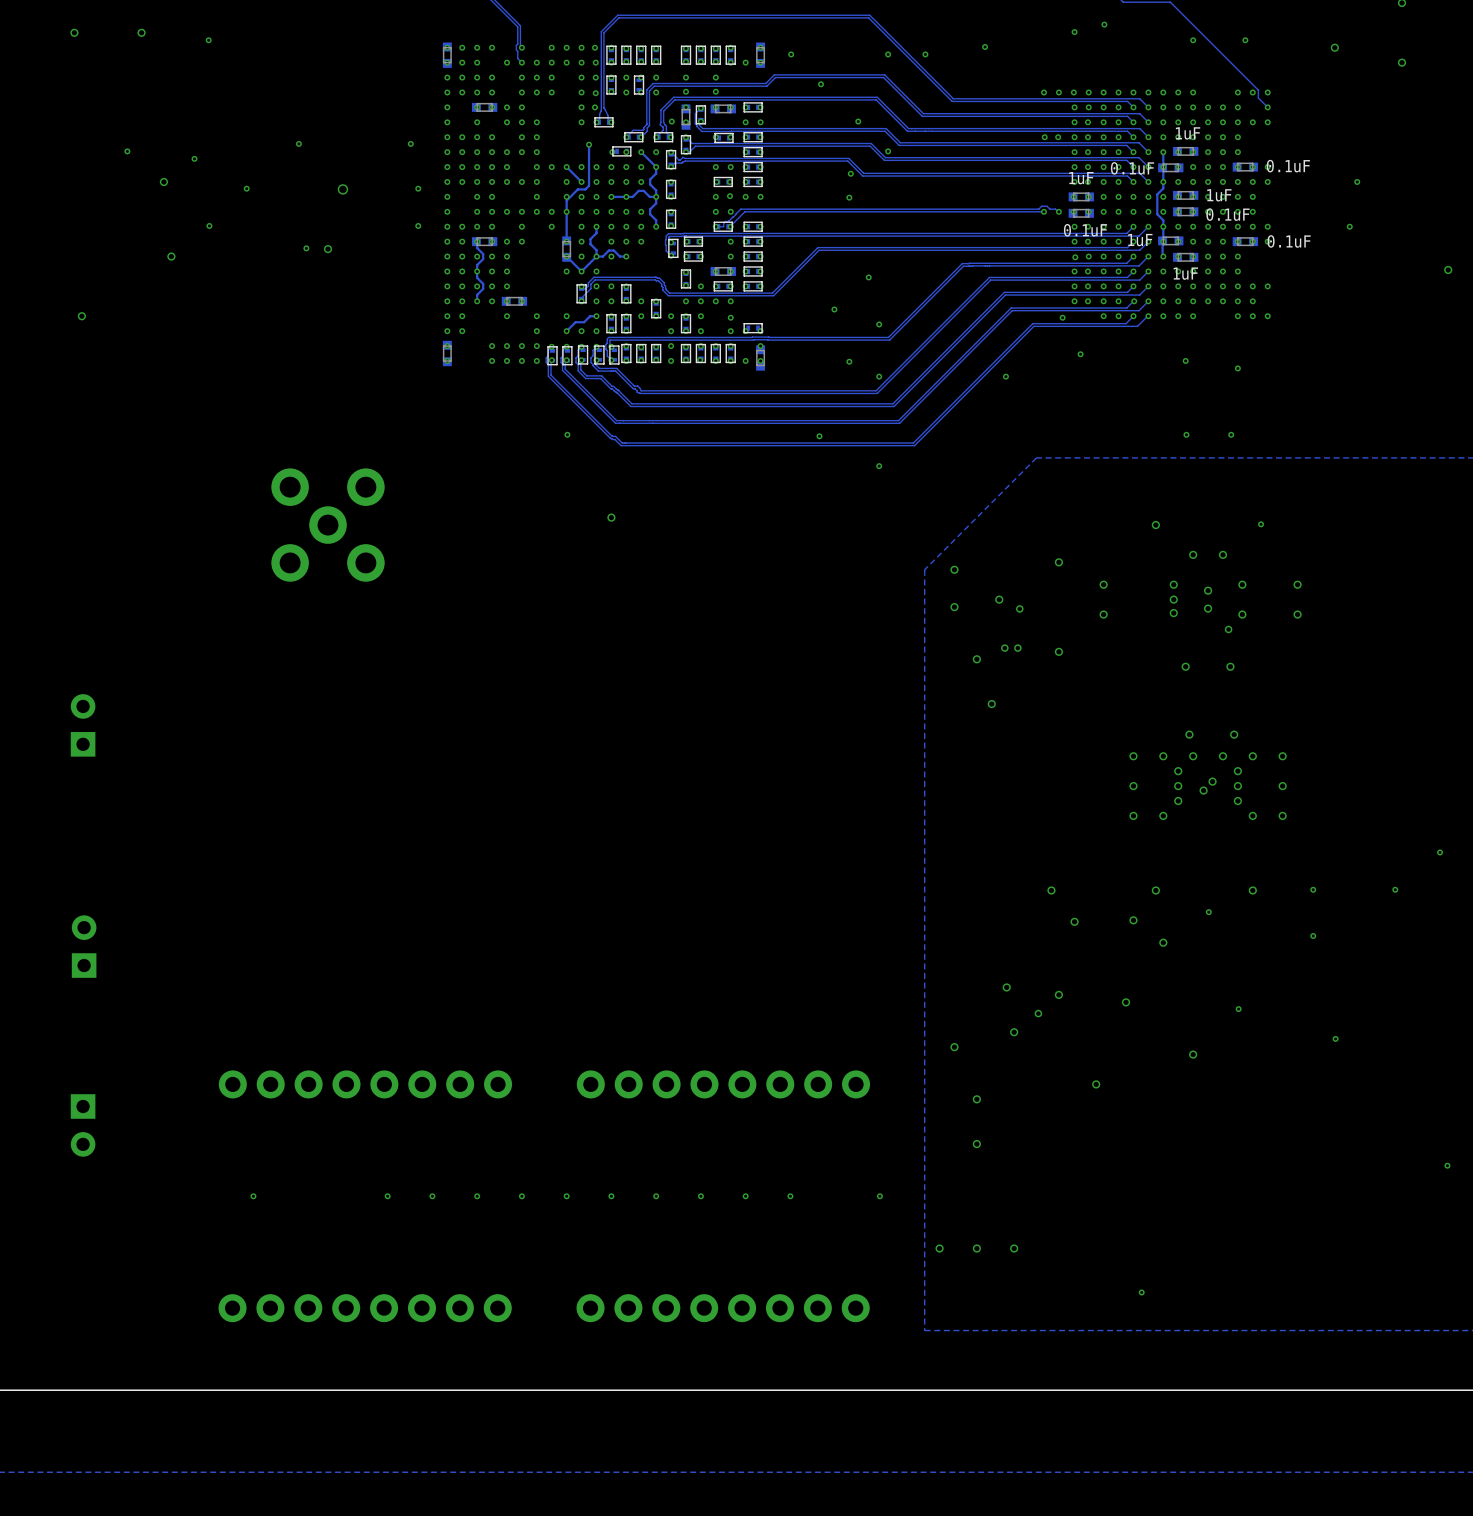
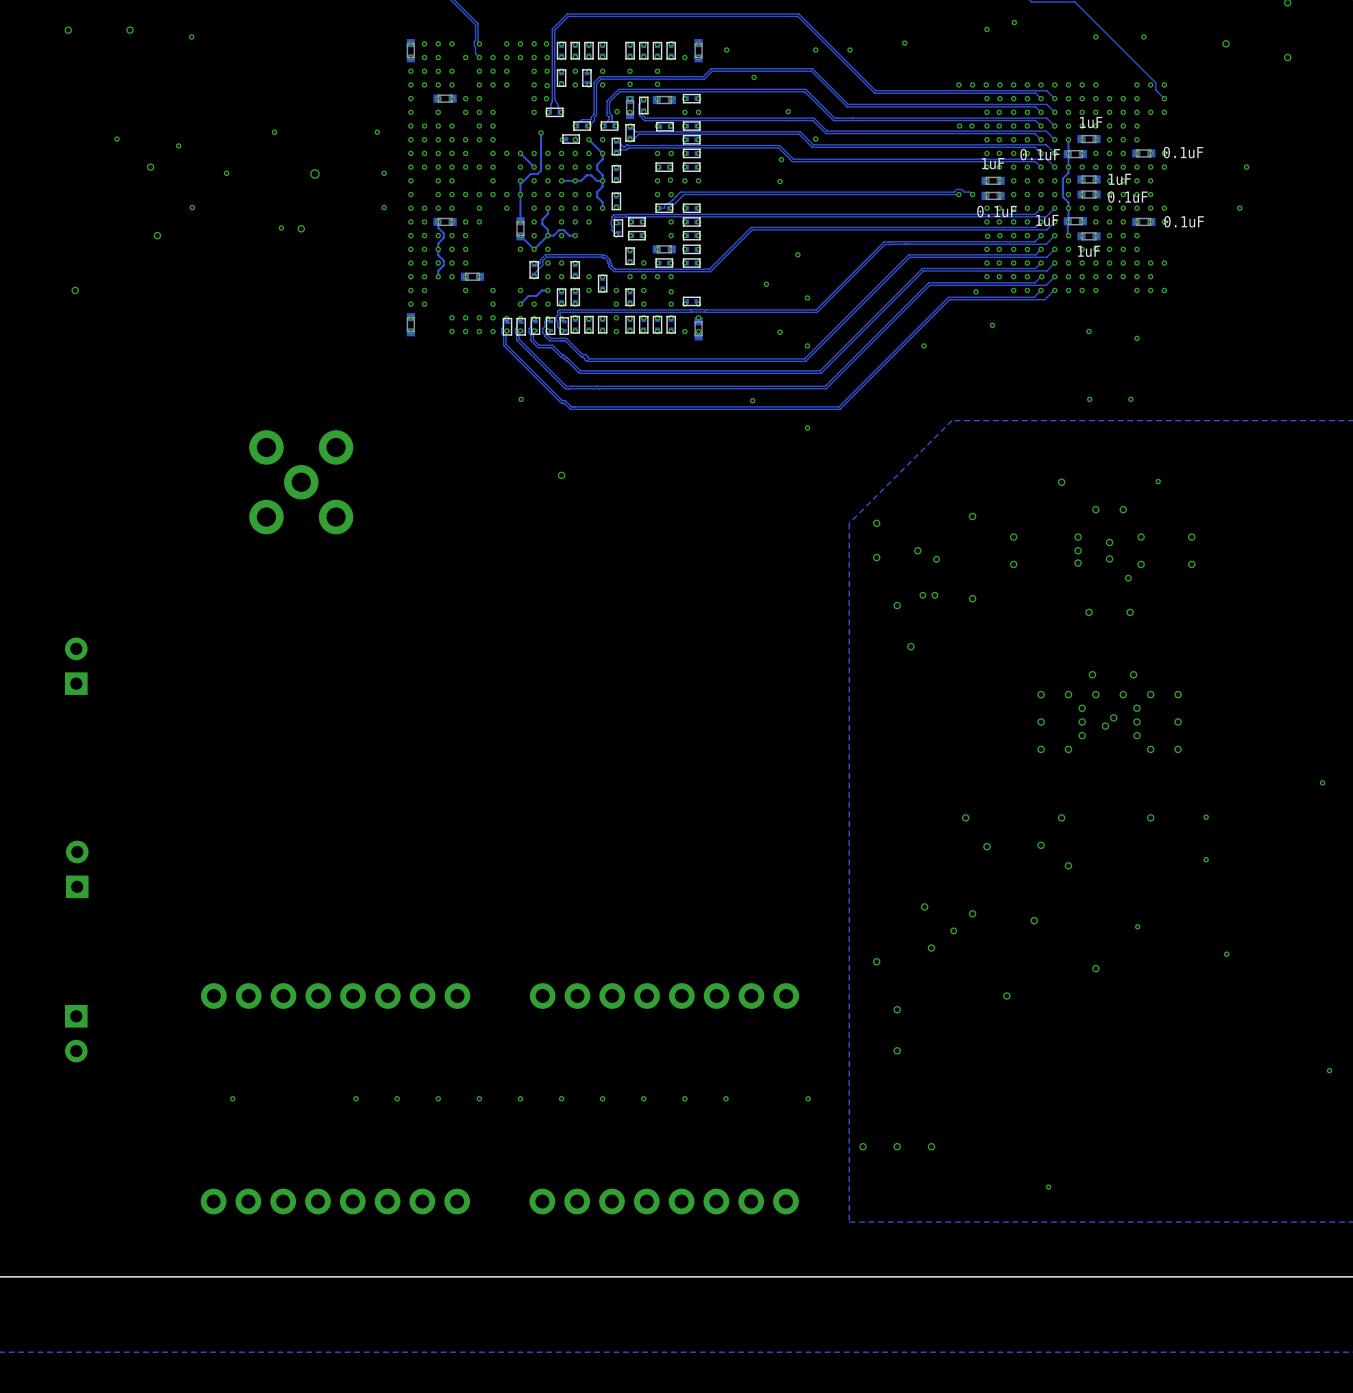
via: (1448, 269) -> none
via: (1395, 889) -> none
via: (1208, 912) -> none

